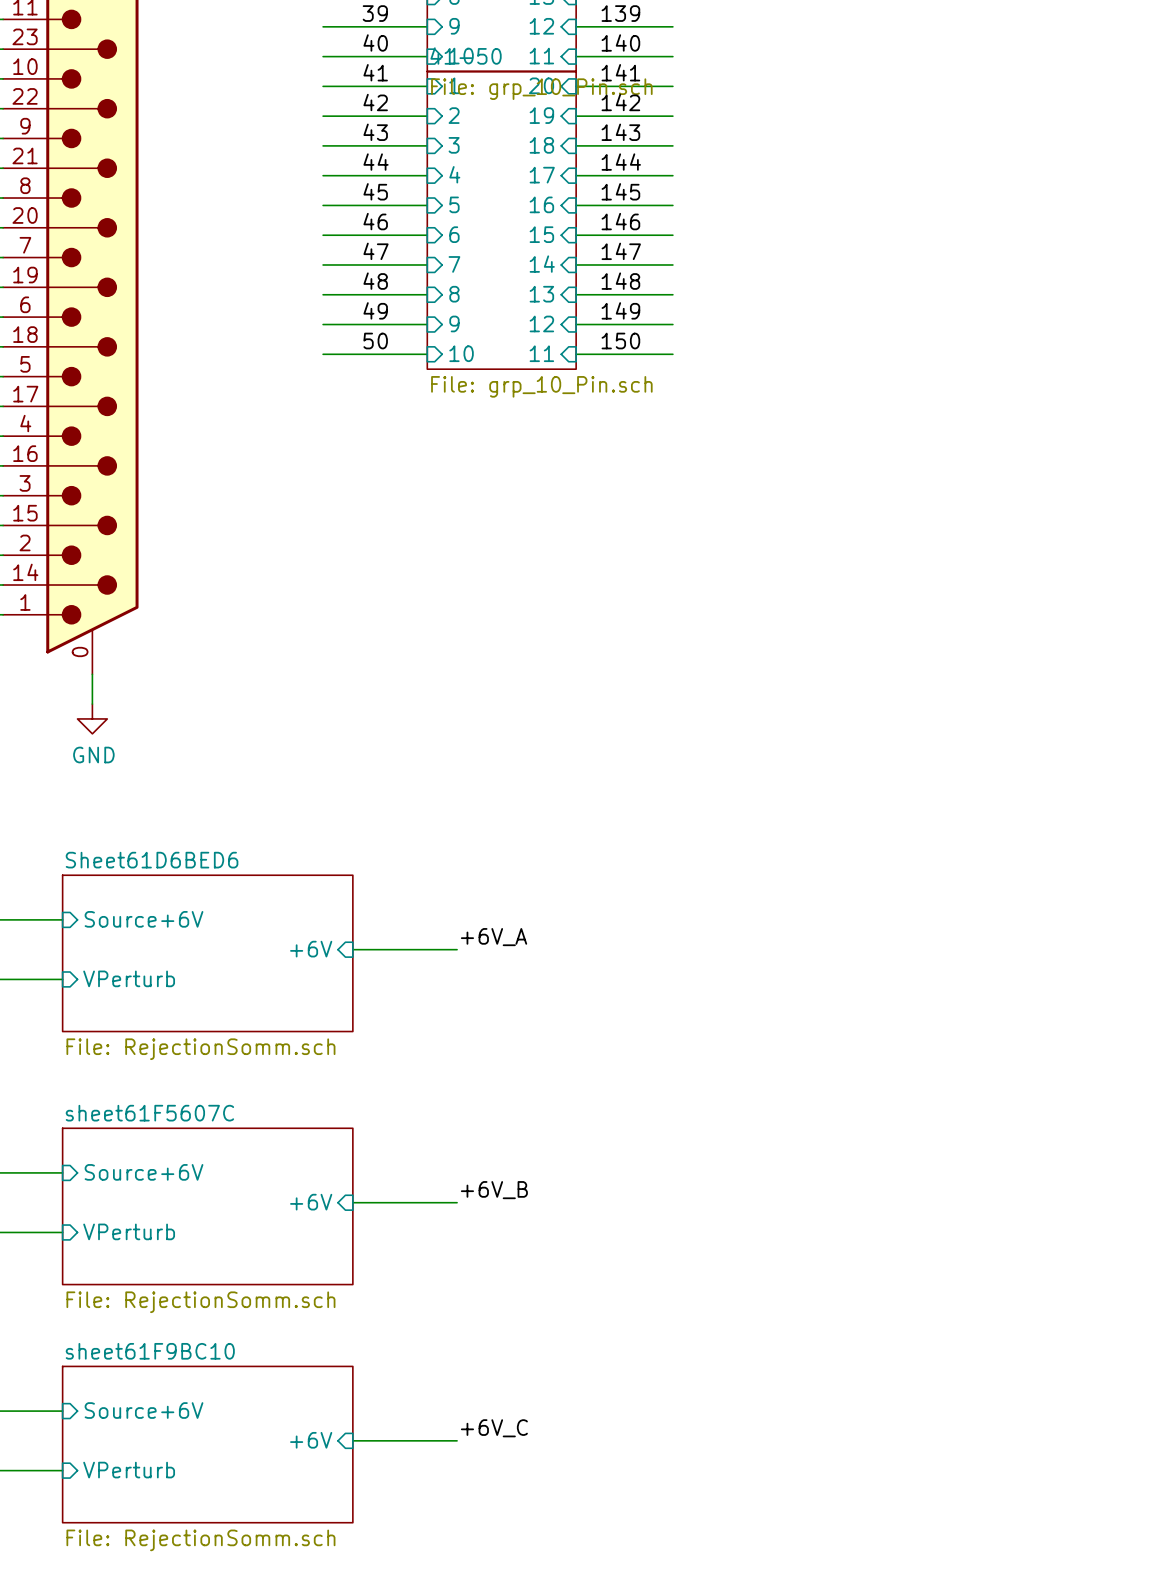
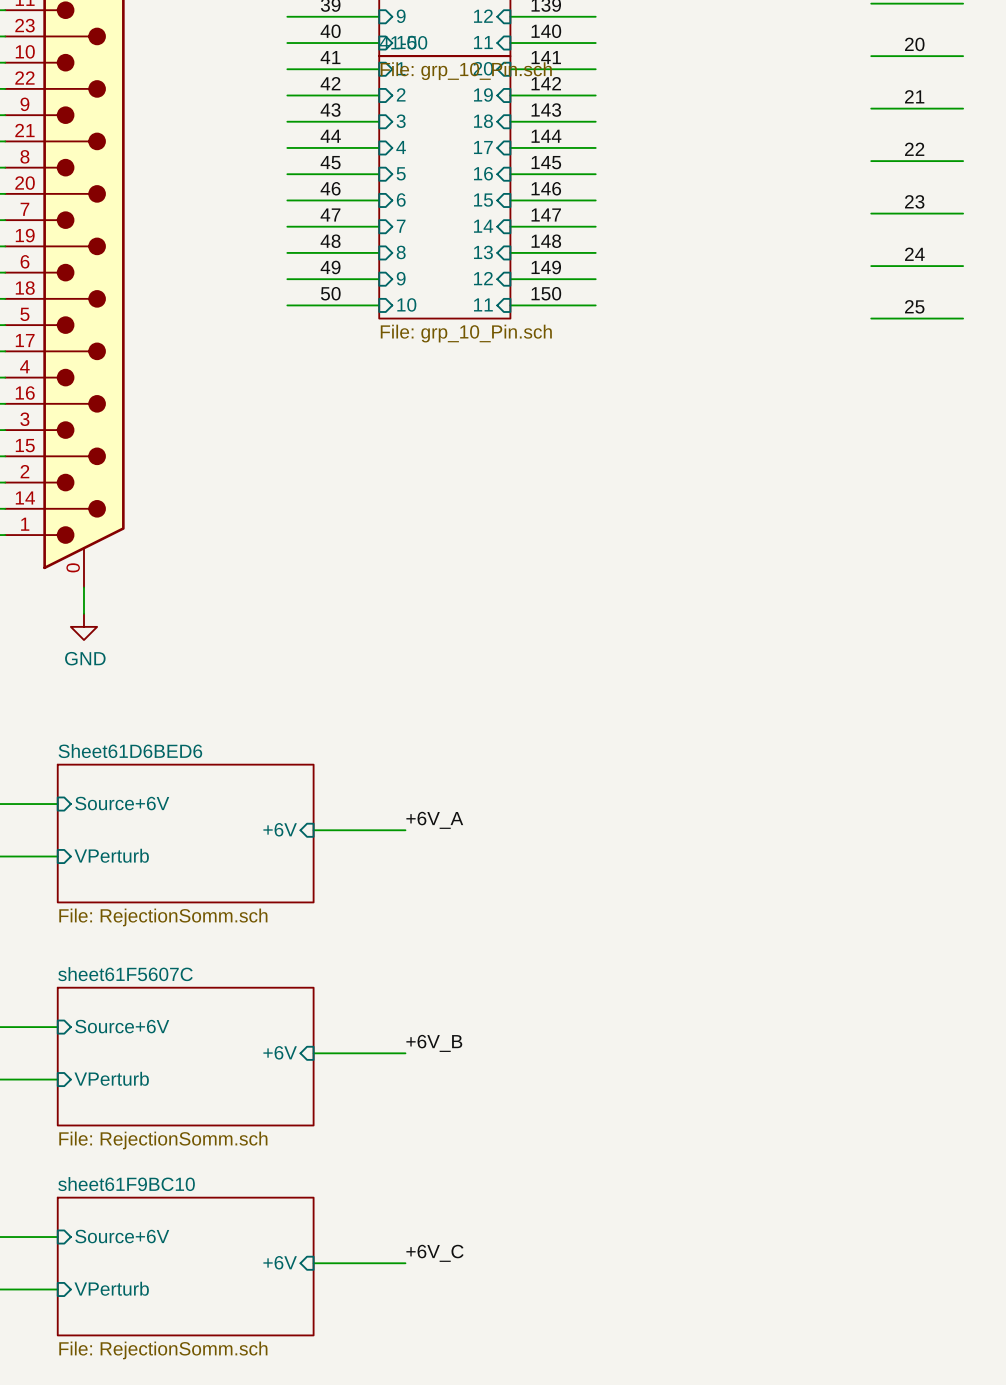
wire: none -> (871, 3) (963, 3)
label: none -> 20 (914, 44)
wire: none -> (871, 56) (963, 56)
label: none -> 21 (914, 96)
wire: none -> (871, 108) (963, 108)
label: none -> 22 (914, 149)
wire: none -> (871, 161) (963, 161)
label: none -> 23 (914, 201)
wire: none -> (871, 213) (963, 213)
label: none -> 24 (914, 254)
wire: none -> (871, 266) (963, 266)
label: none -> 25 (914, 306)
wire: none -> (871, 318) (963, 318)

